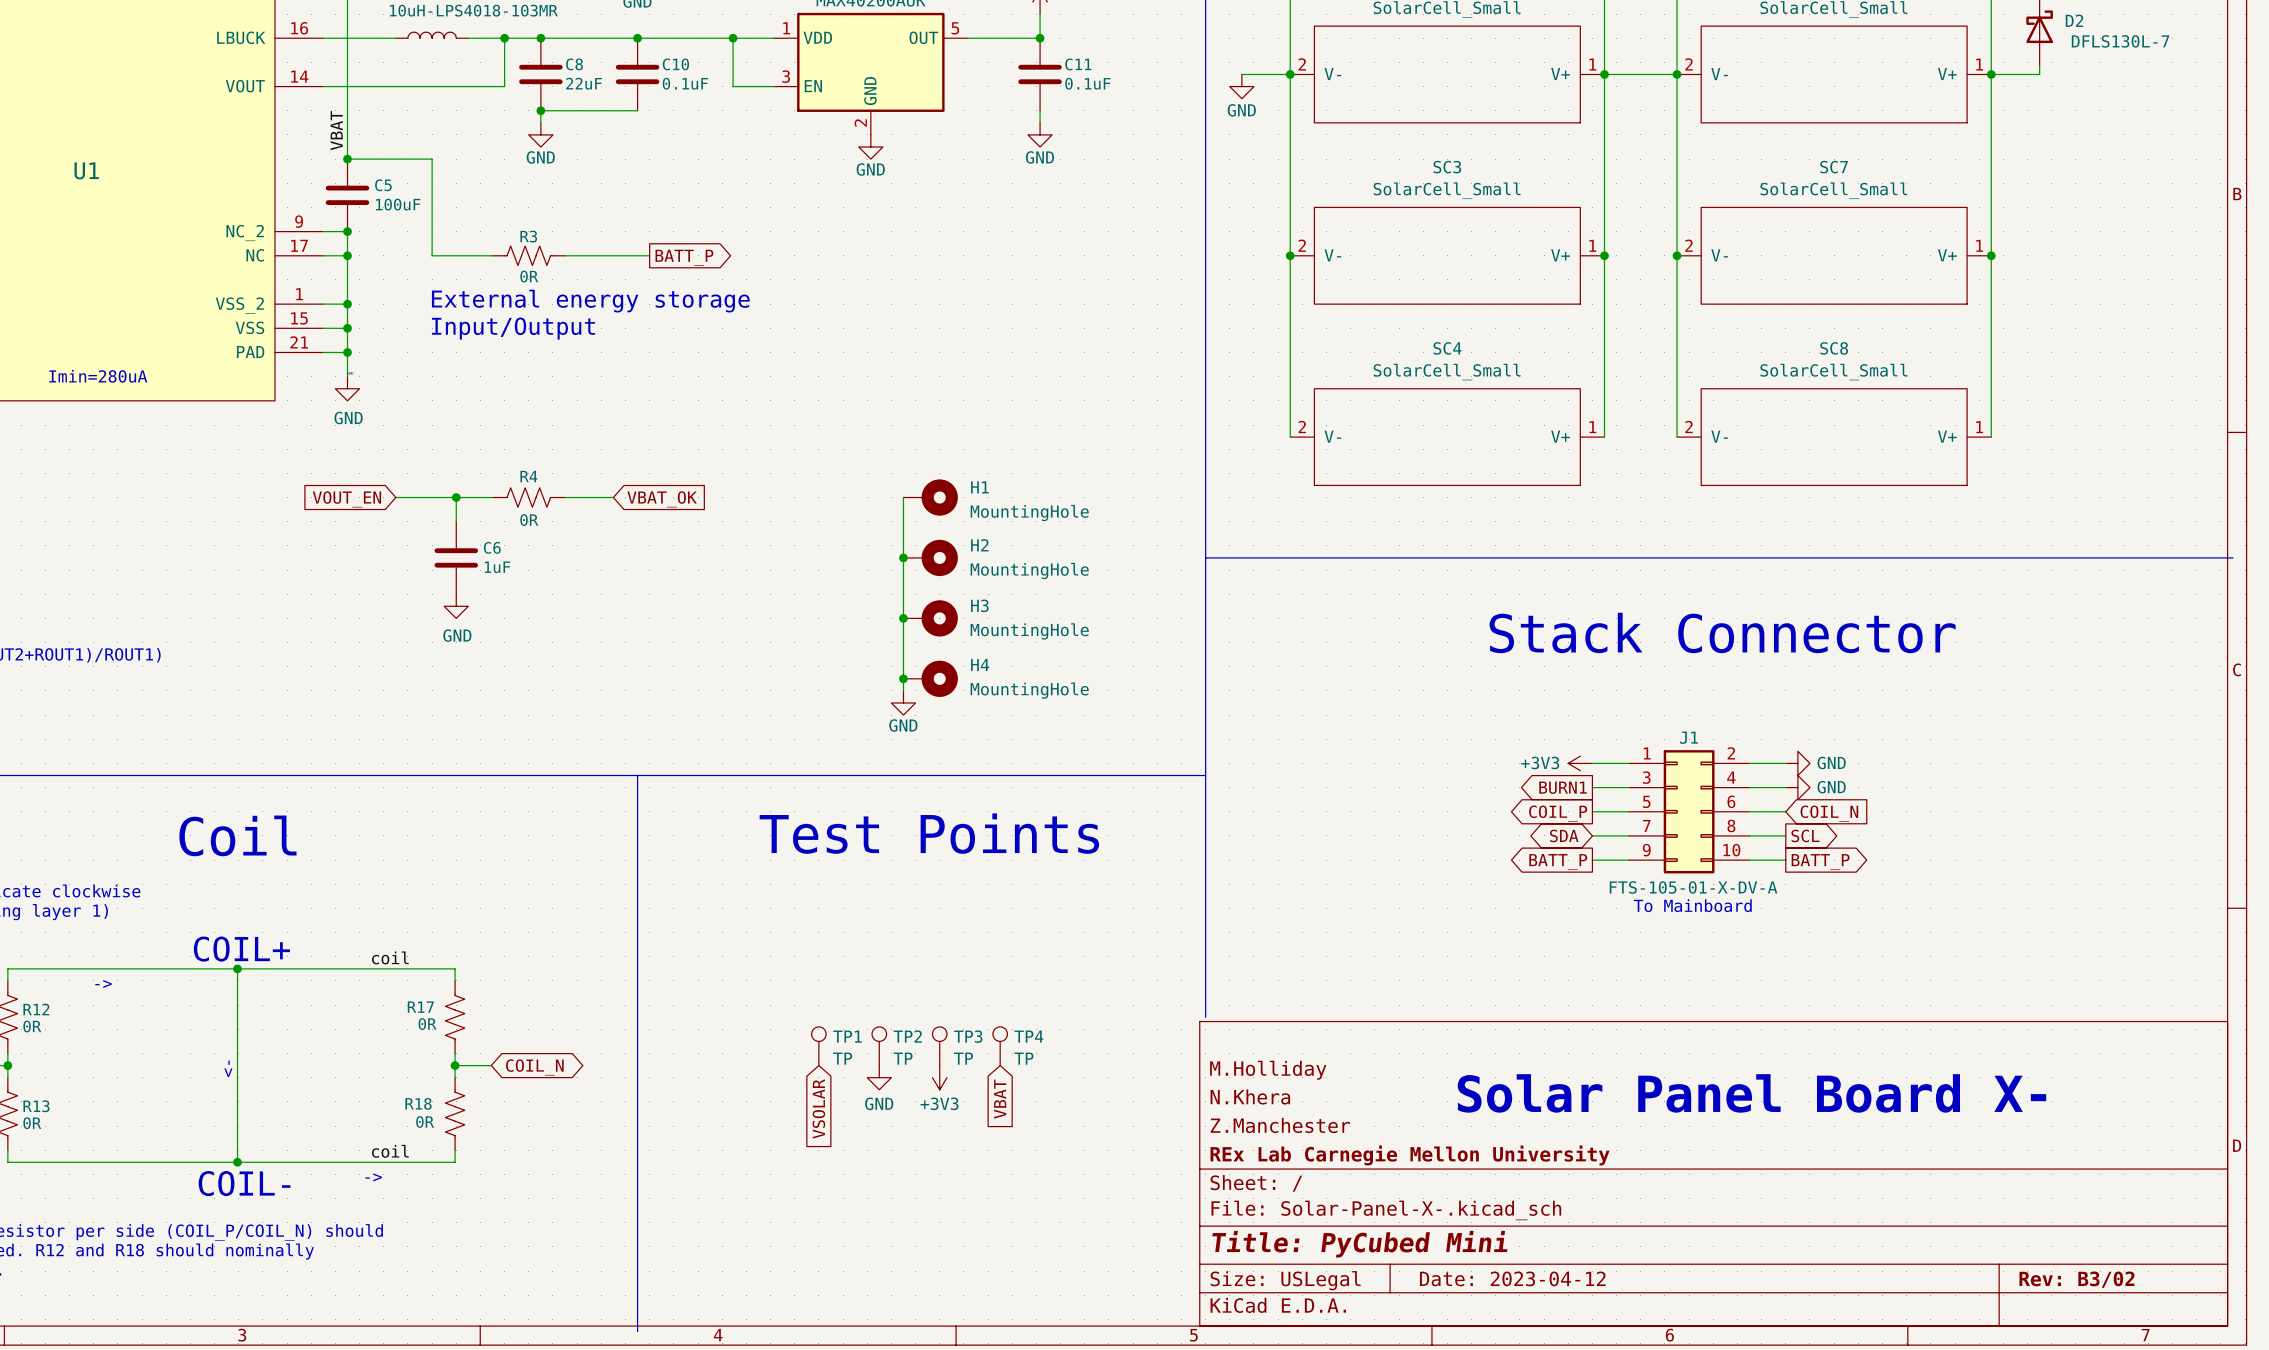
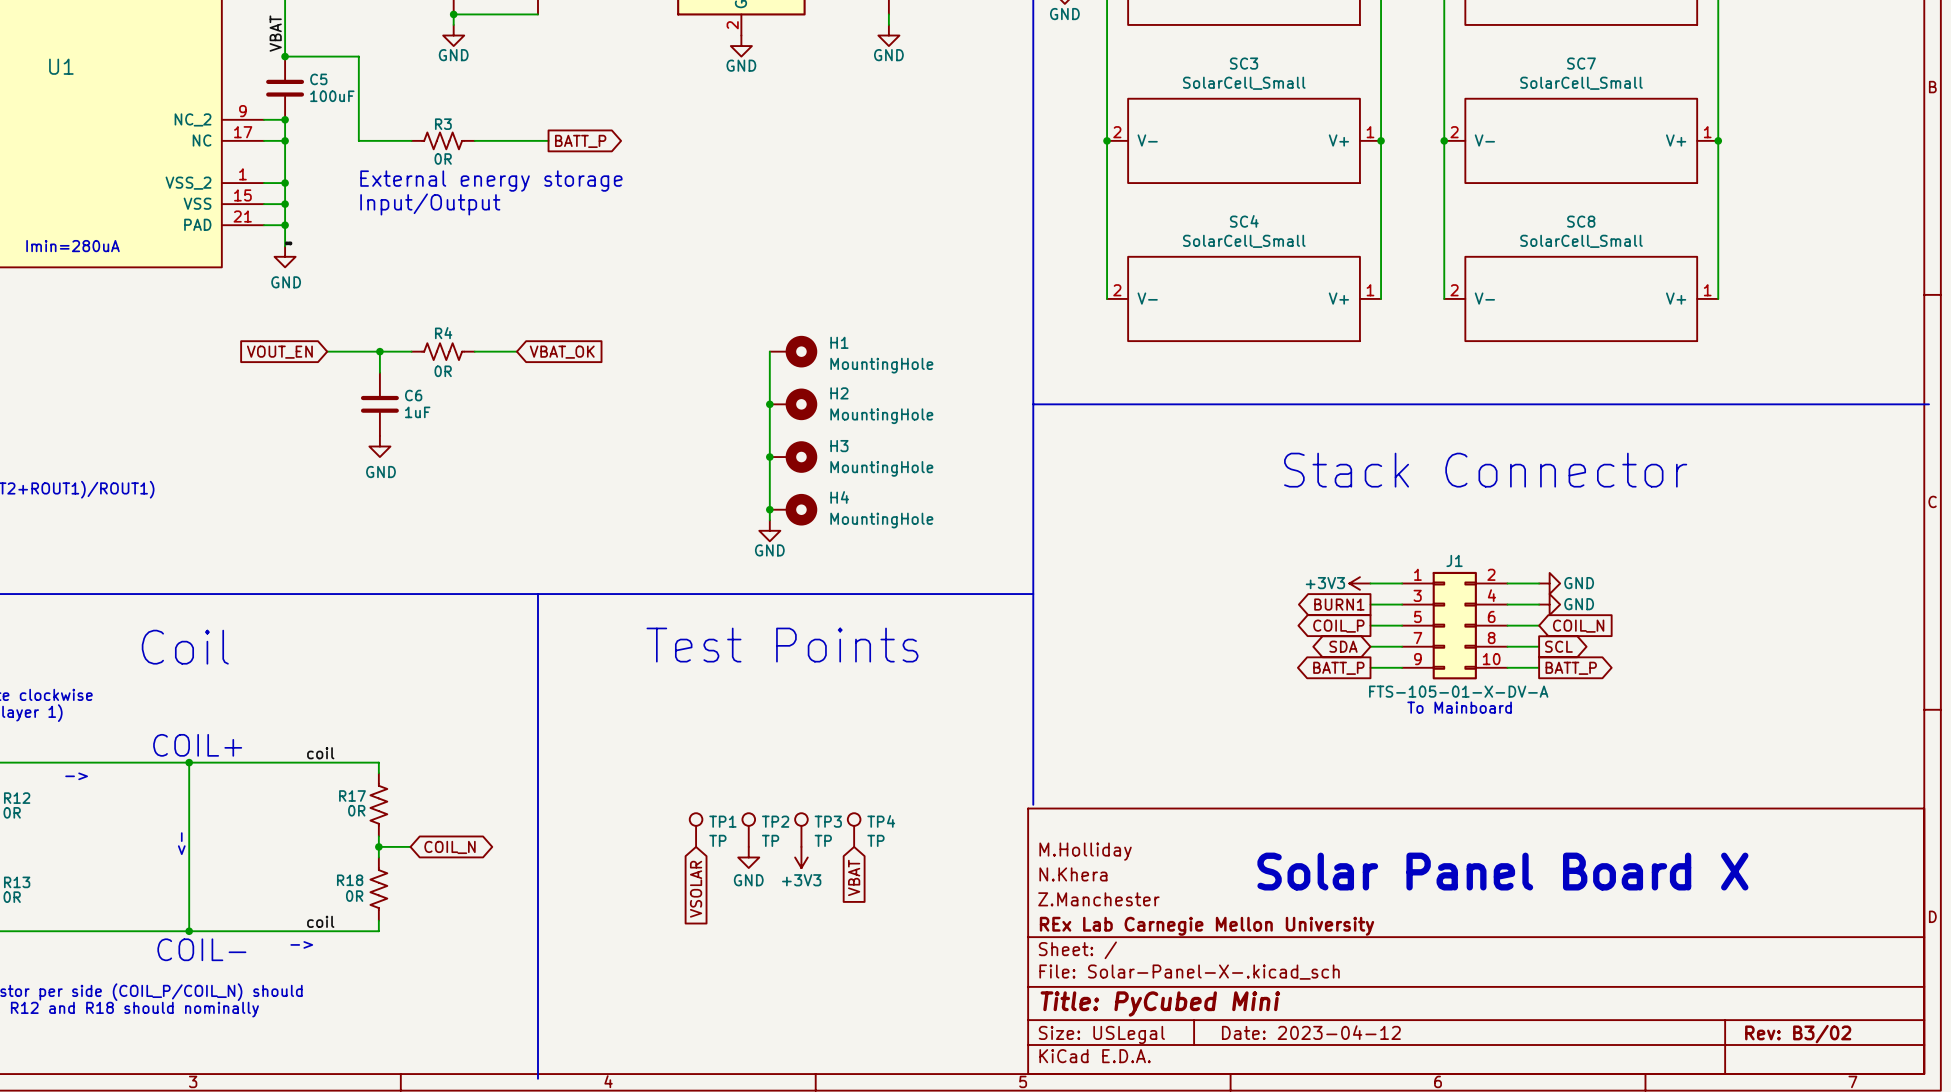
text: Solar Panel Board X- (1751, 1093) -> Solar Panel Board X (1502, 871)

